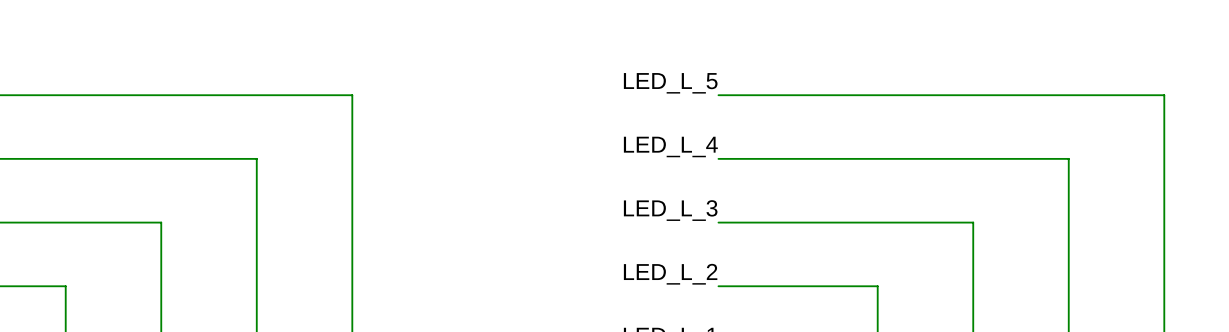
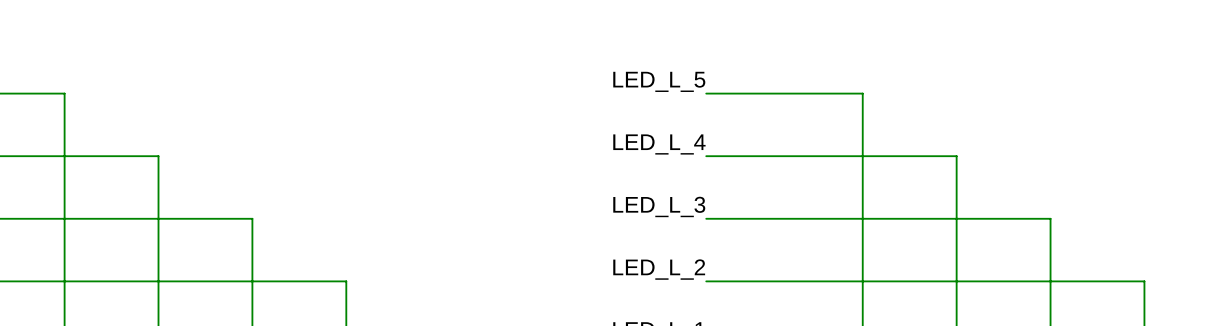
wire: (65, 95) (352, 95) (352, 286) -> (64, 93) (64, 281) (346, 281)
wire: (877, 95) (1164, 95) (1164, 286) -> (862, 93) (862, 281) (1144, 281)
wire: (161, 158) (256, 158) (256, 222) -> (158, 156) (158, 218) (252, 218)
wire: (973, 158) (1068, 158) (1068, 222) -> (956, 156) (956, 218) (1050, 218)

